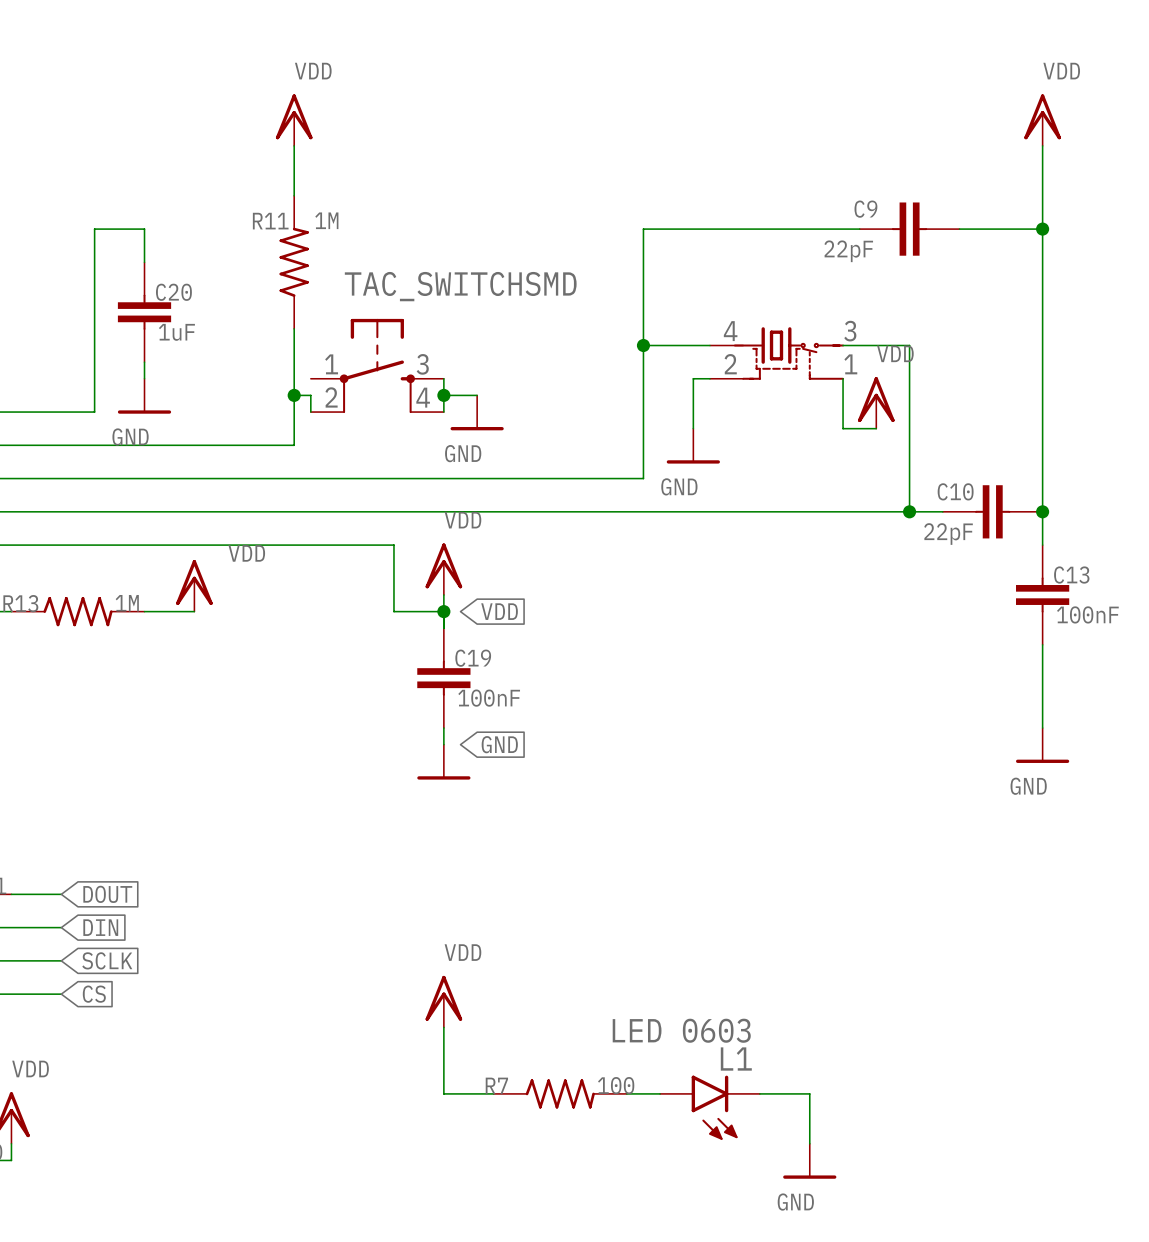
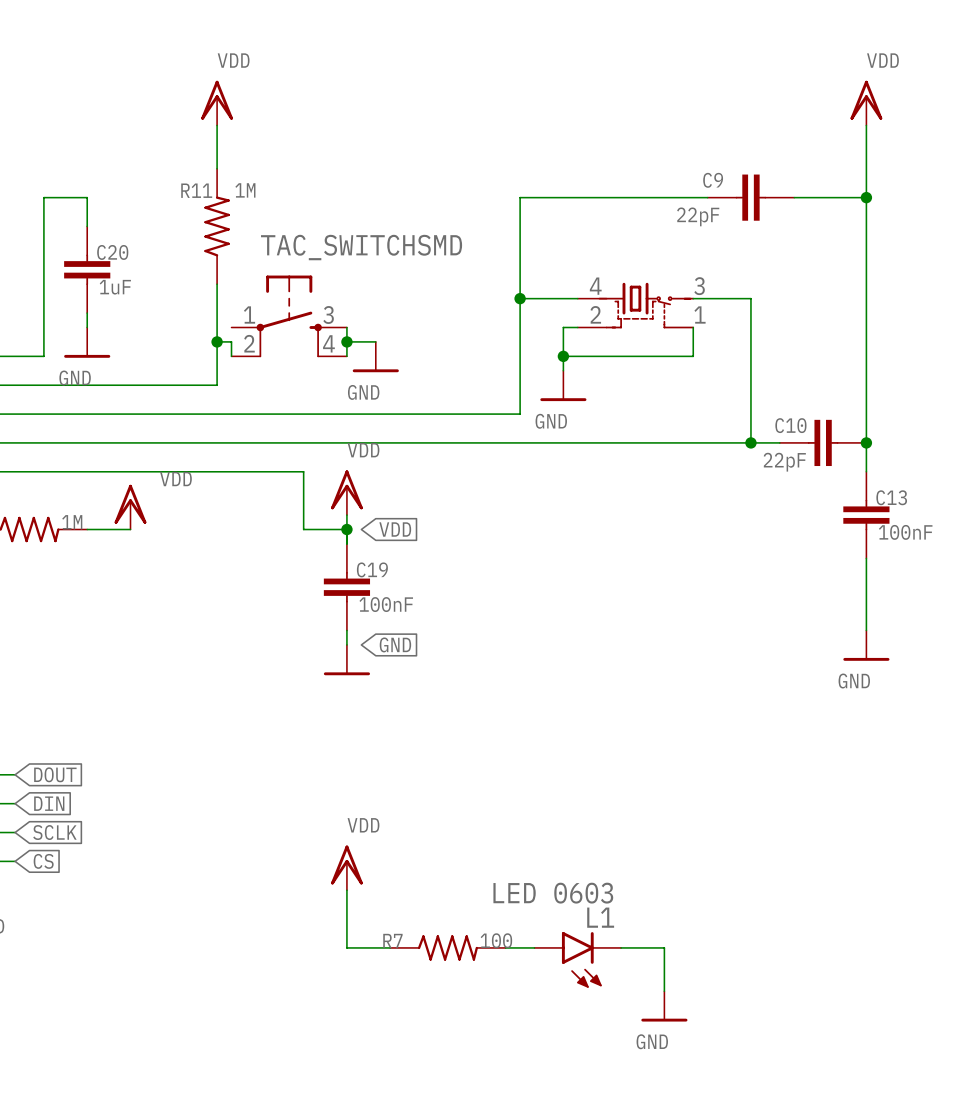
power symbol: VDD (876, 402) -> none
junction: none -> (563, 356)
wire: (843, 412) (843, 428) (876, 428) -> (693, 356) (563, 356)

